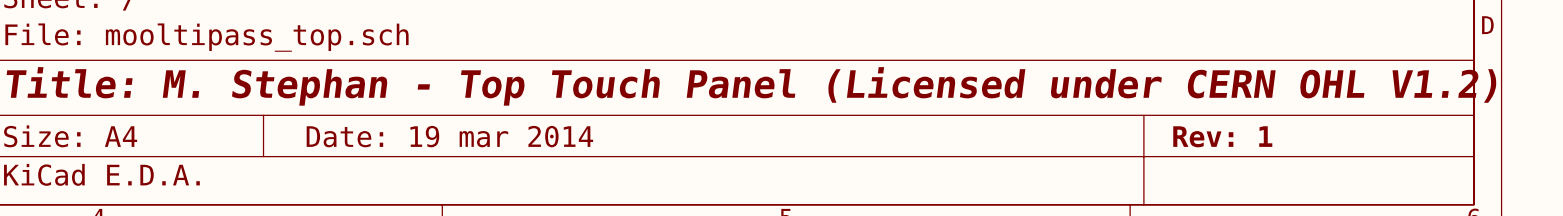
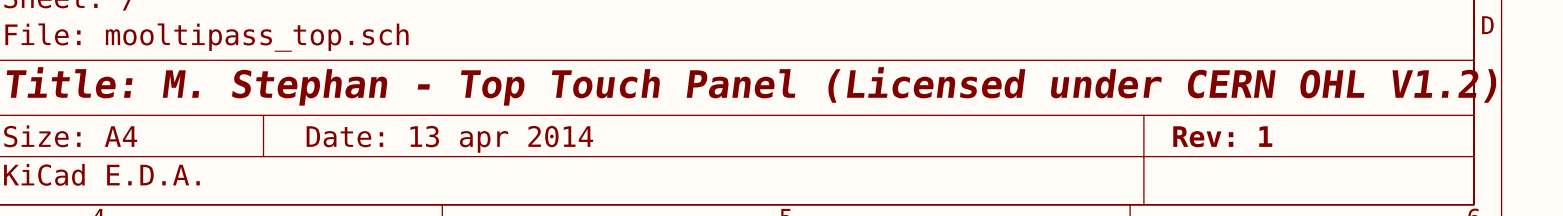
title block: Date: 19 mar 2014 (449, 136) -> Date: 13 apr 2014 (449, 139)

